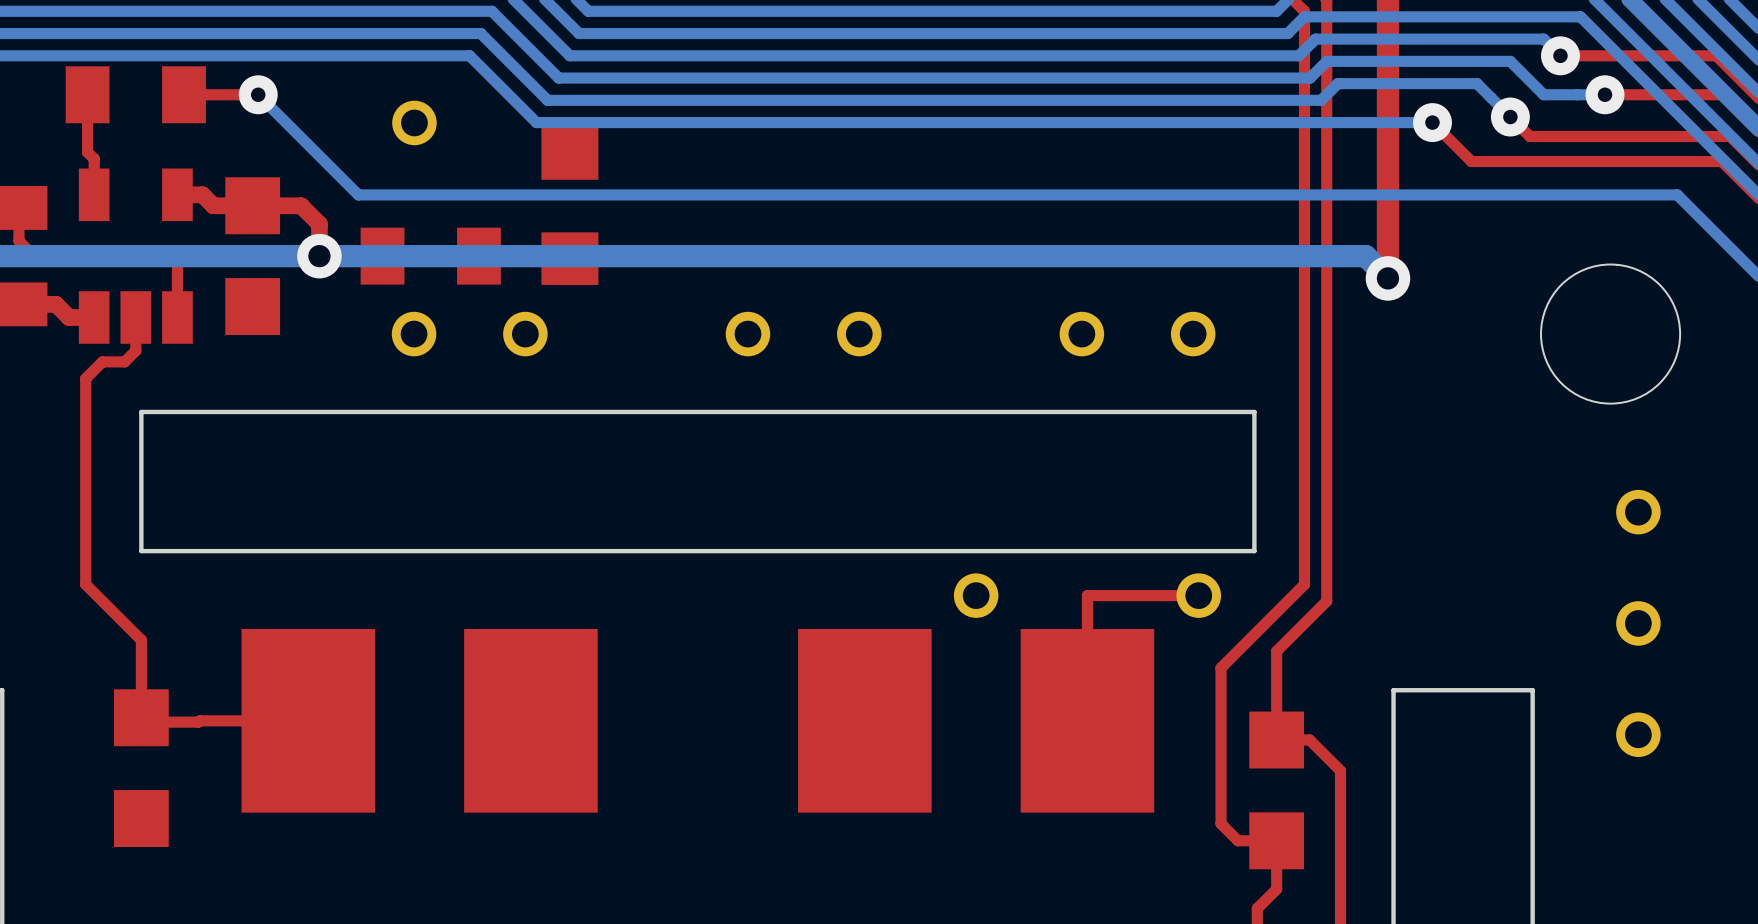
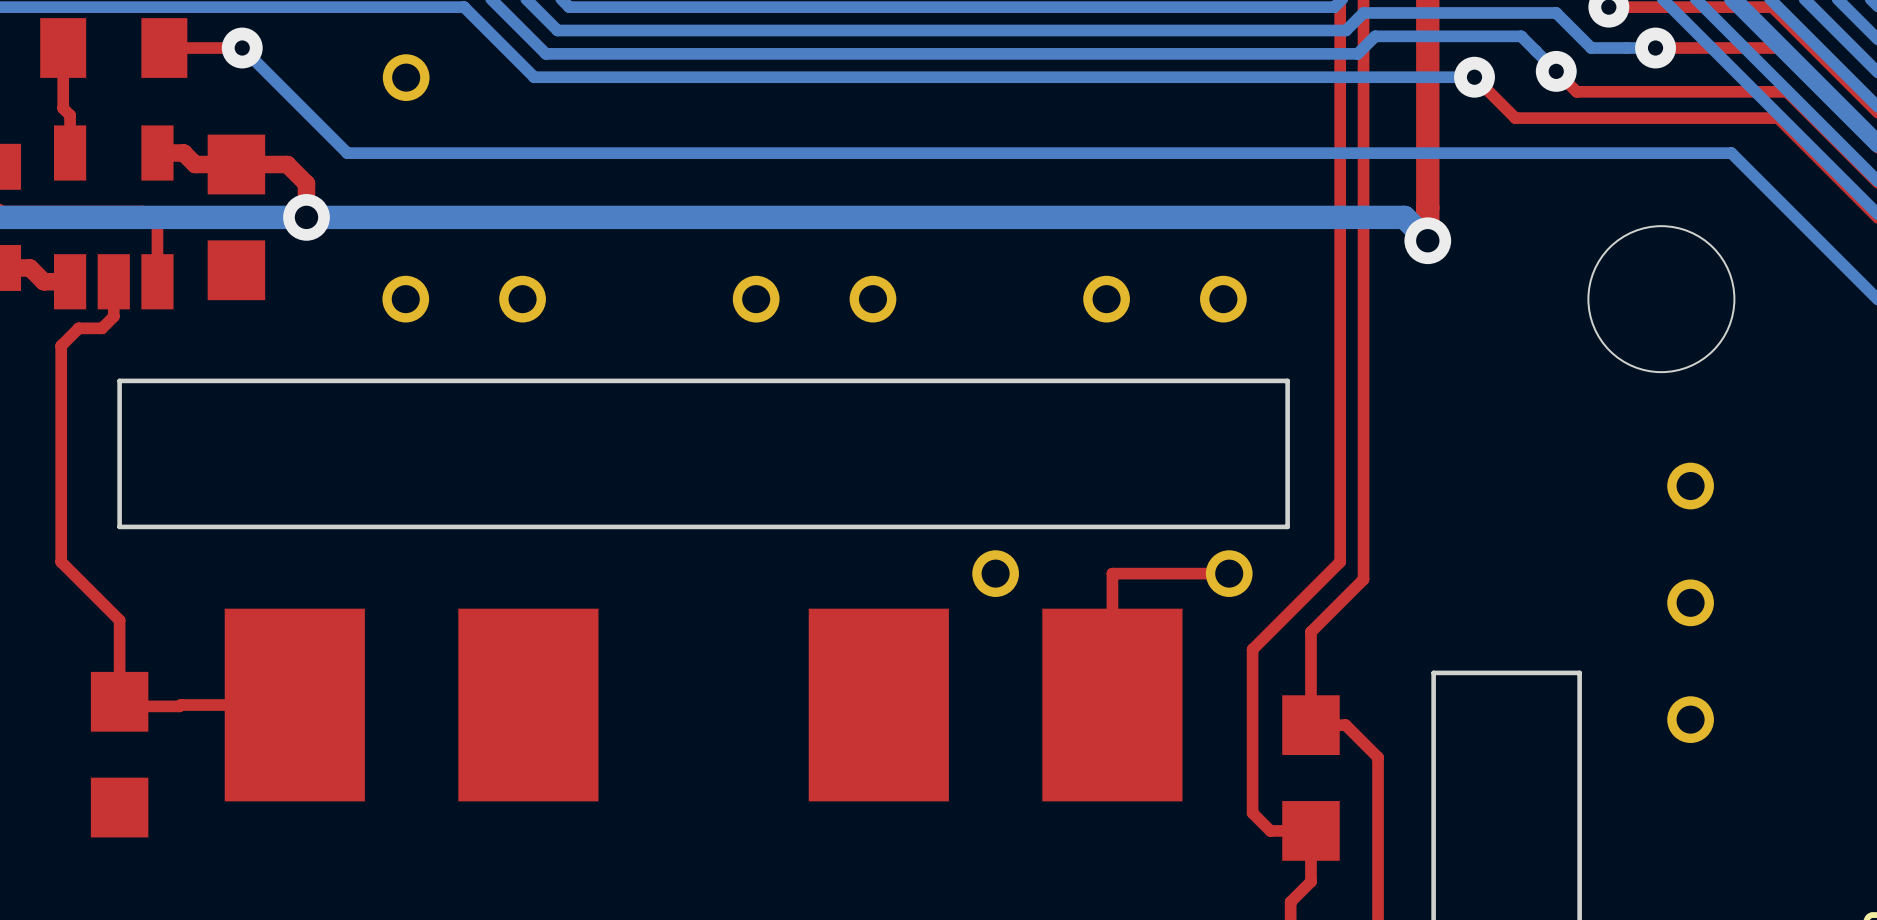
part: (569, 206) -> none
part: (430, 256) -> none

